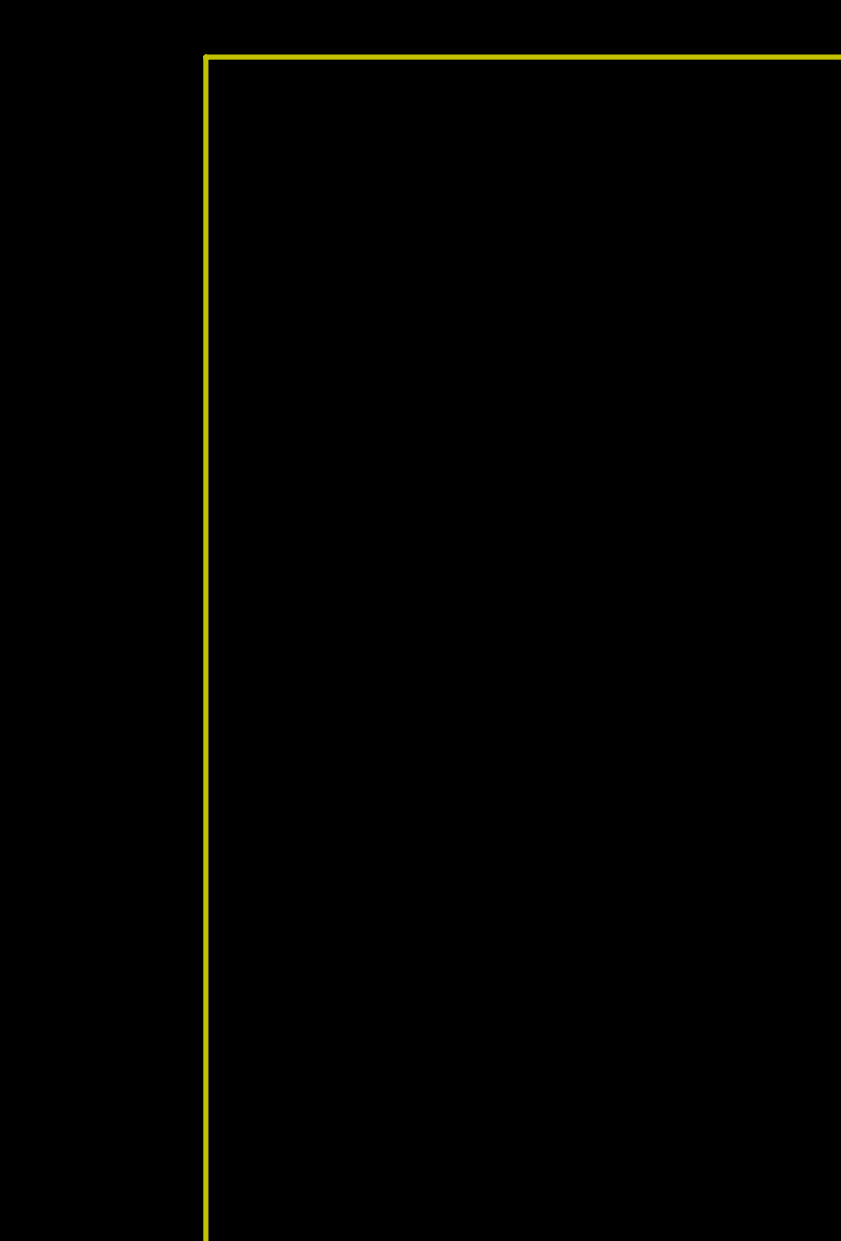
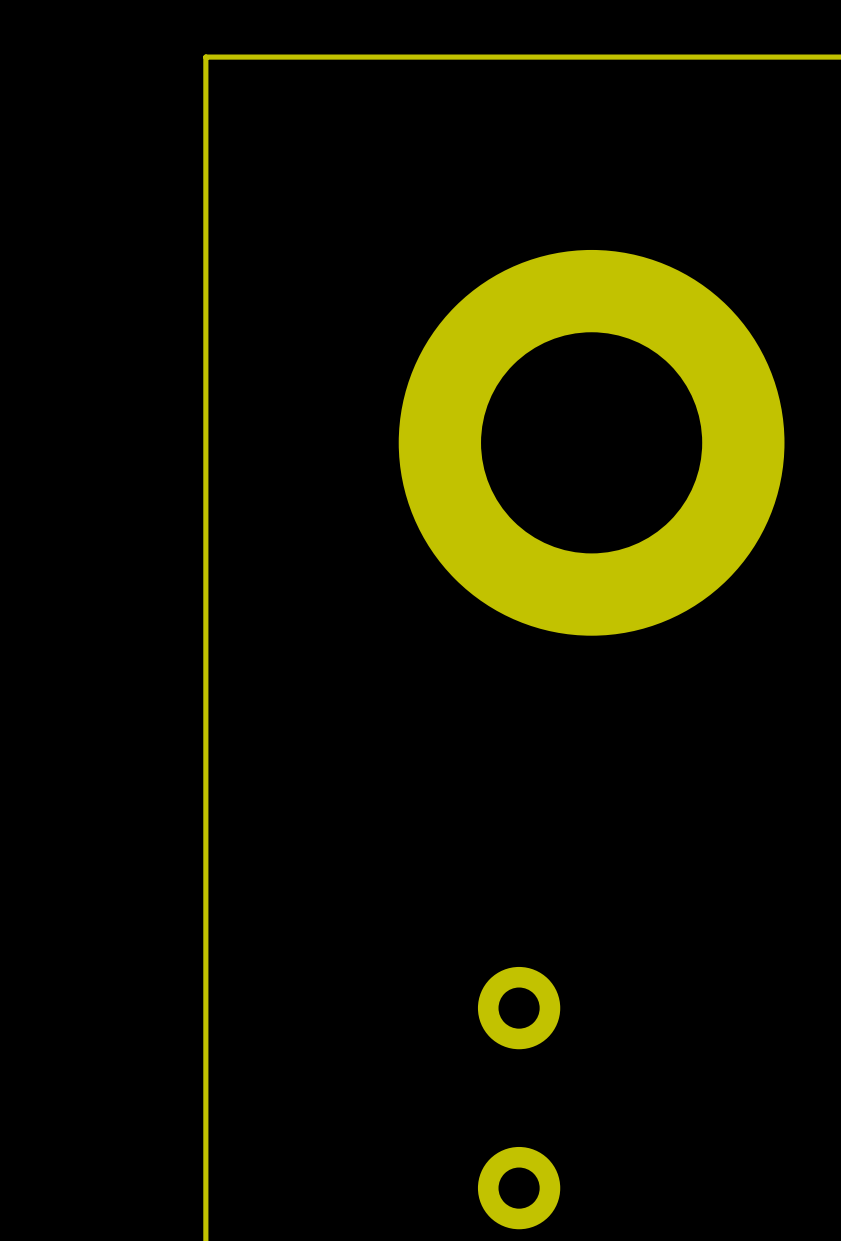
part: none -> (591, 442)
part: none -> (519, 1098)

